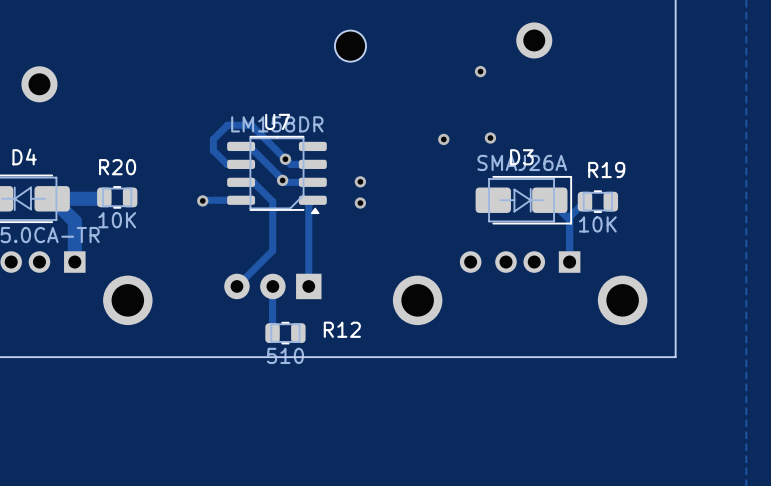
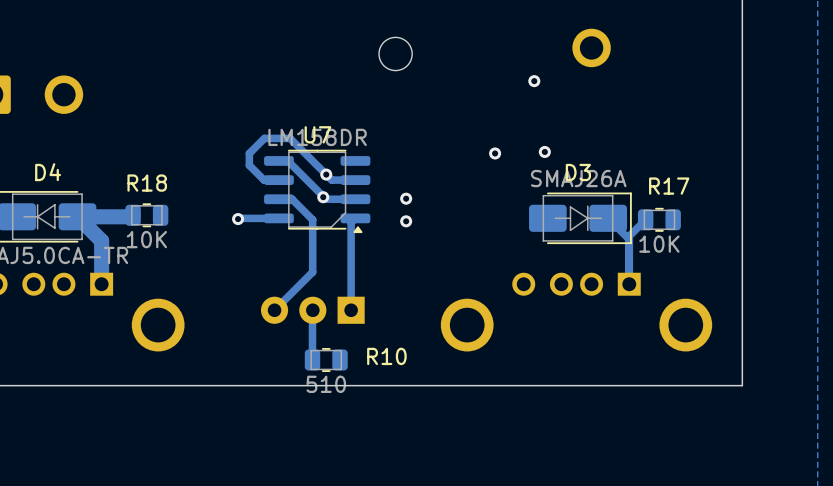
R20 name: R20 (117, 167) -> R18 (147, 183)
R19 name: R19 (606, 170) -> R17 (669, 186)
R12 name: R12 (342, 329) -> R10 (386, 356)

